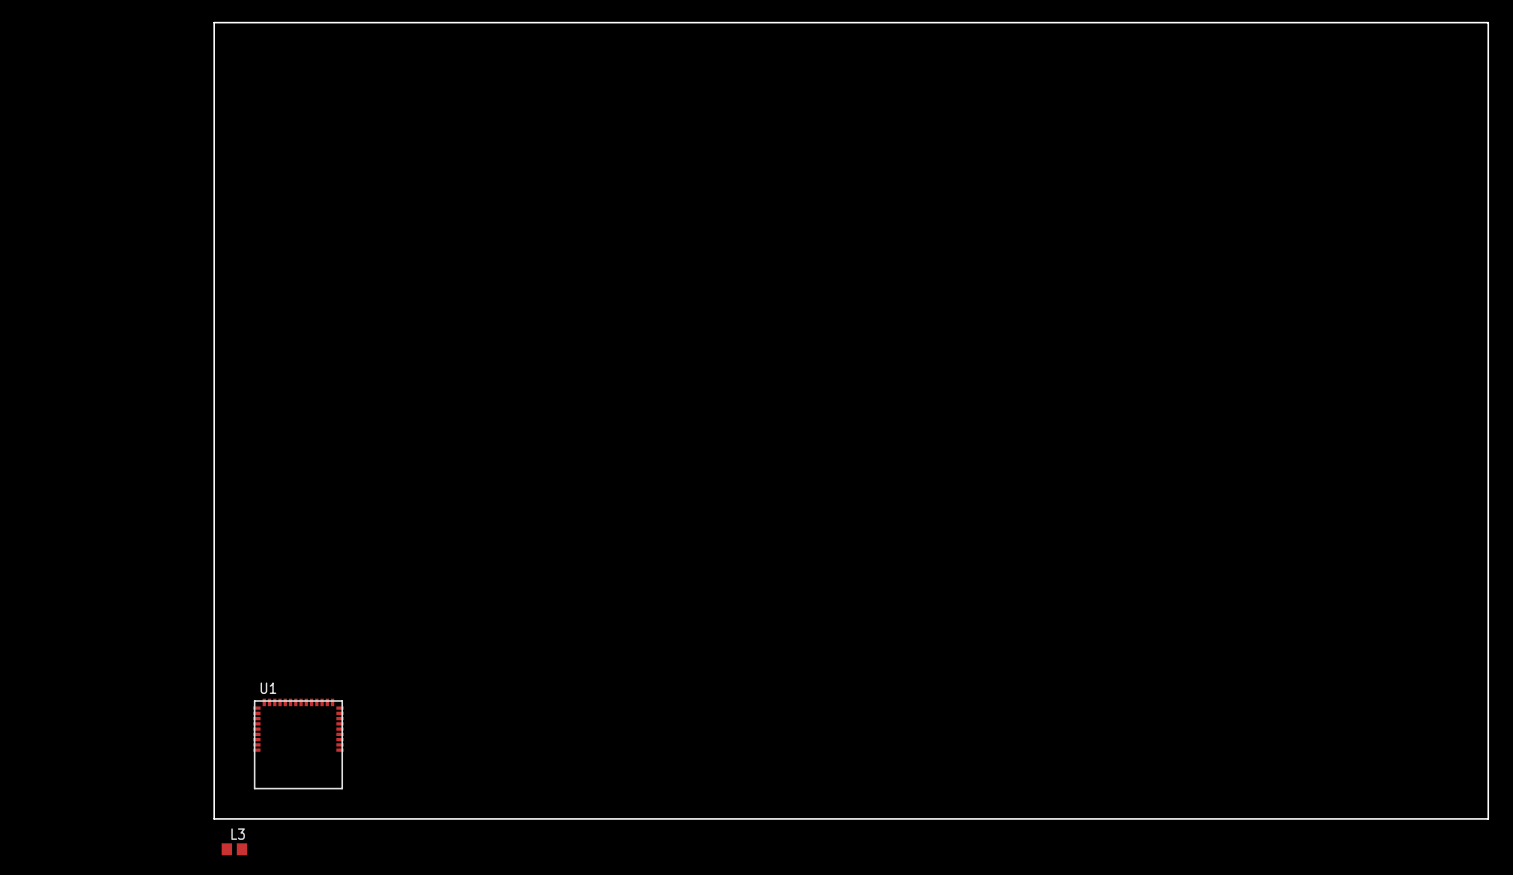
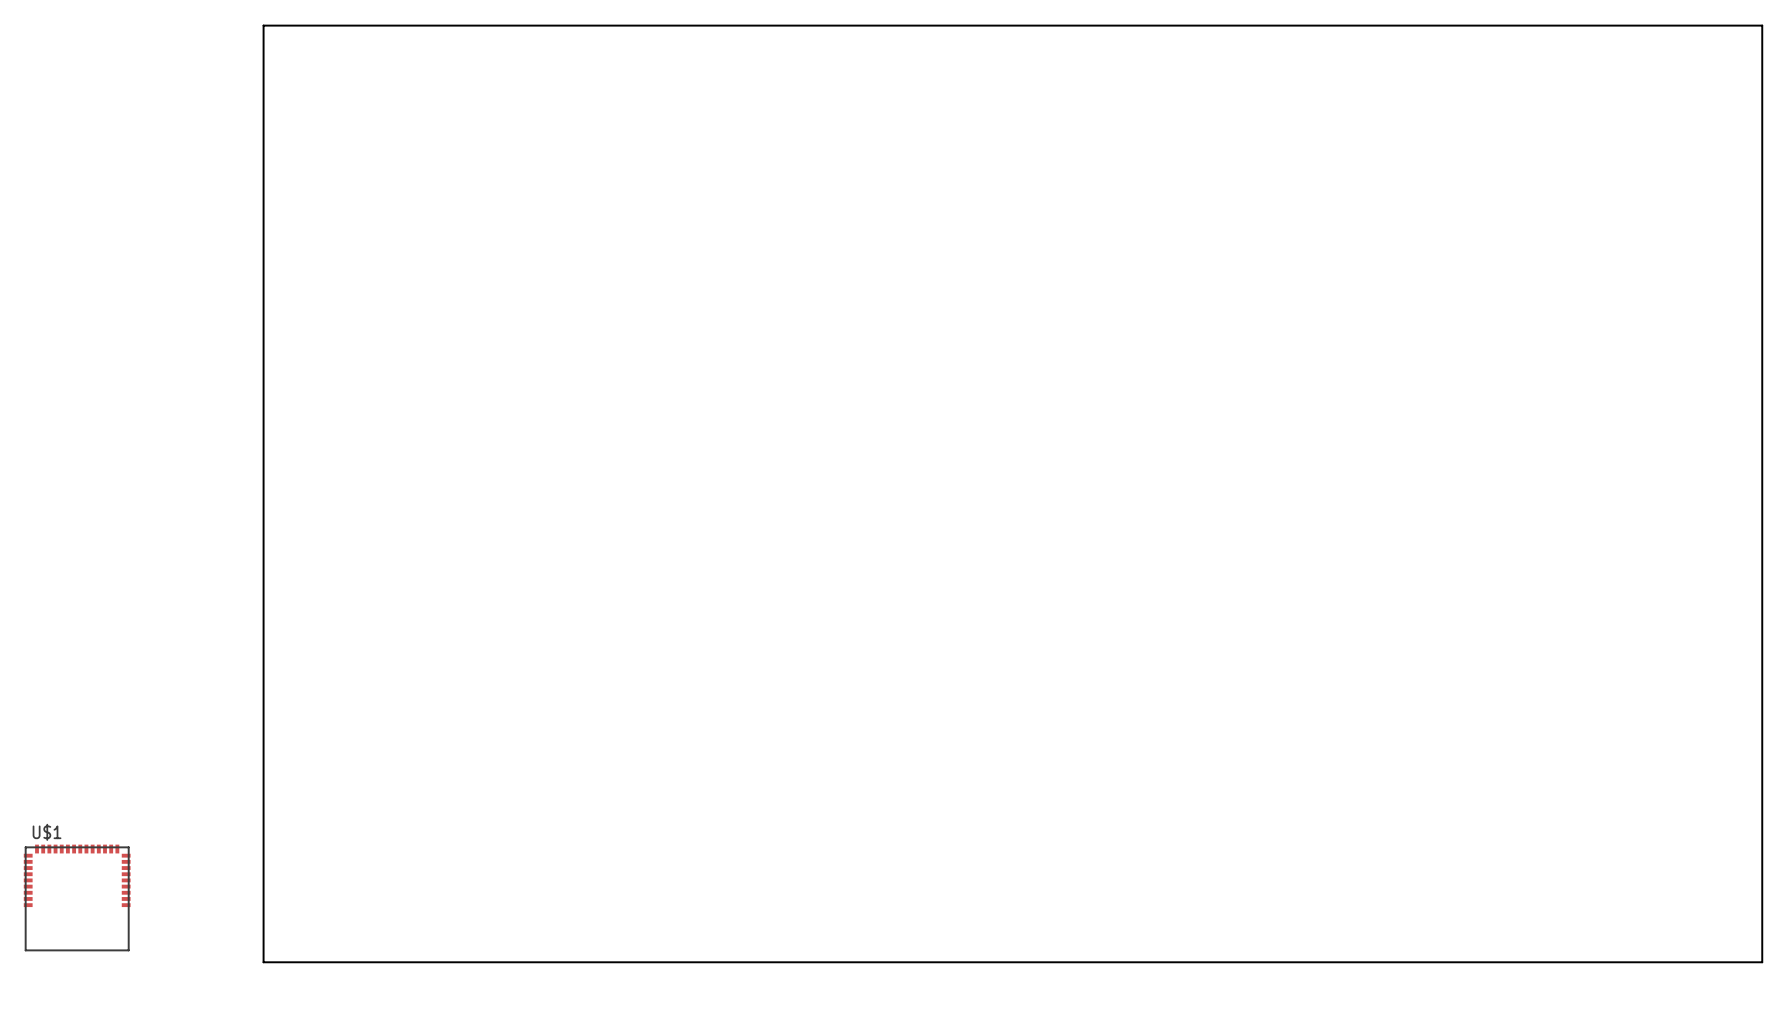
U1: (298, 743) -> none
U$1: none -> (77, 897)
L3: (234, 849) -> none

